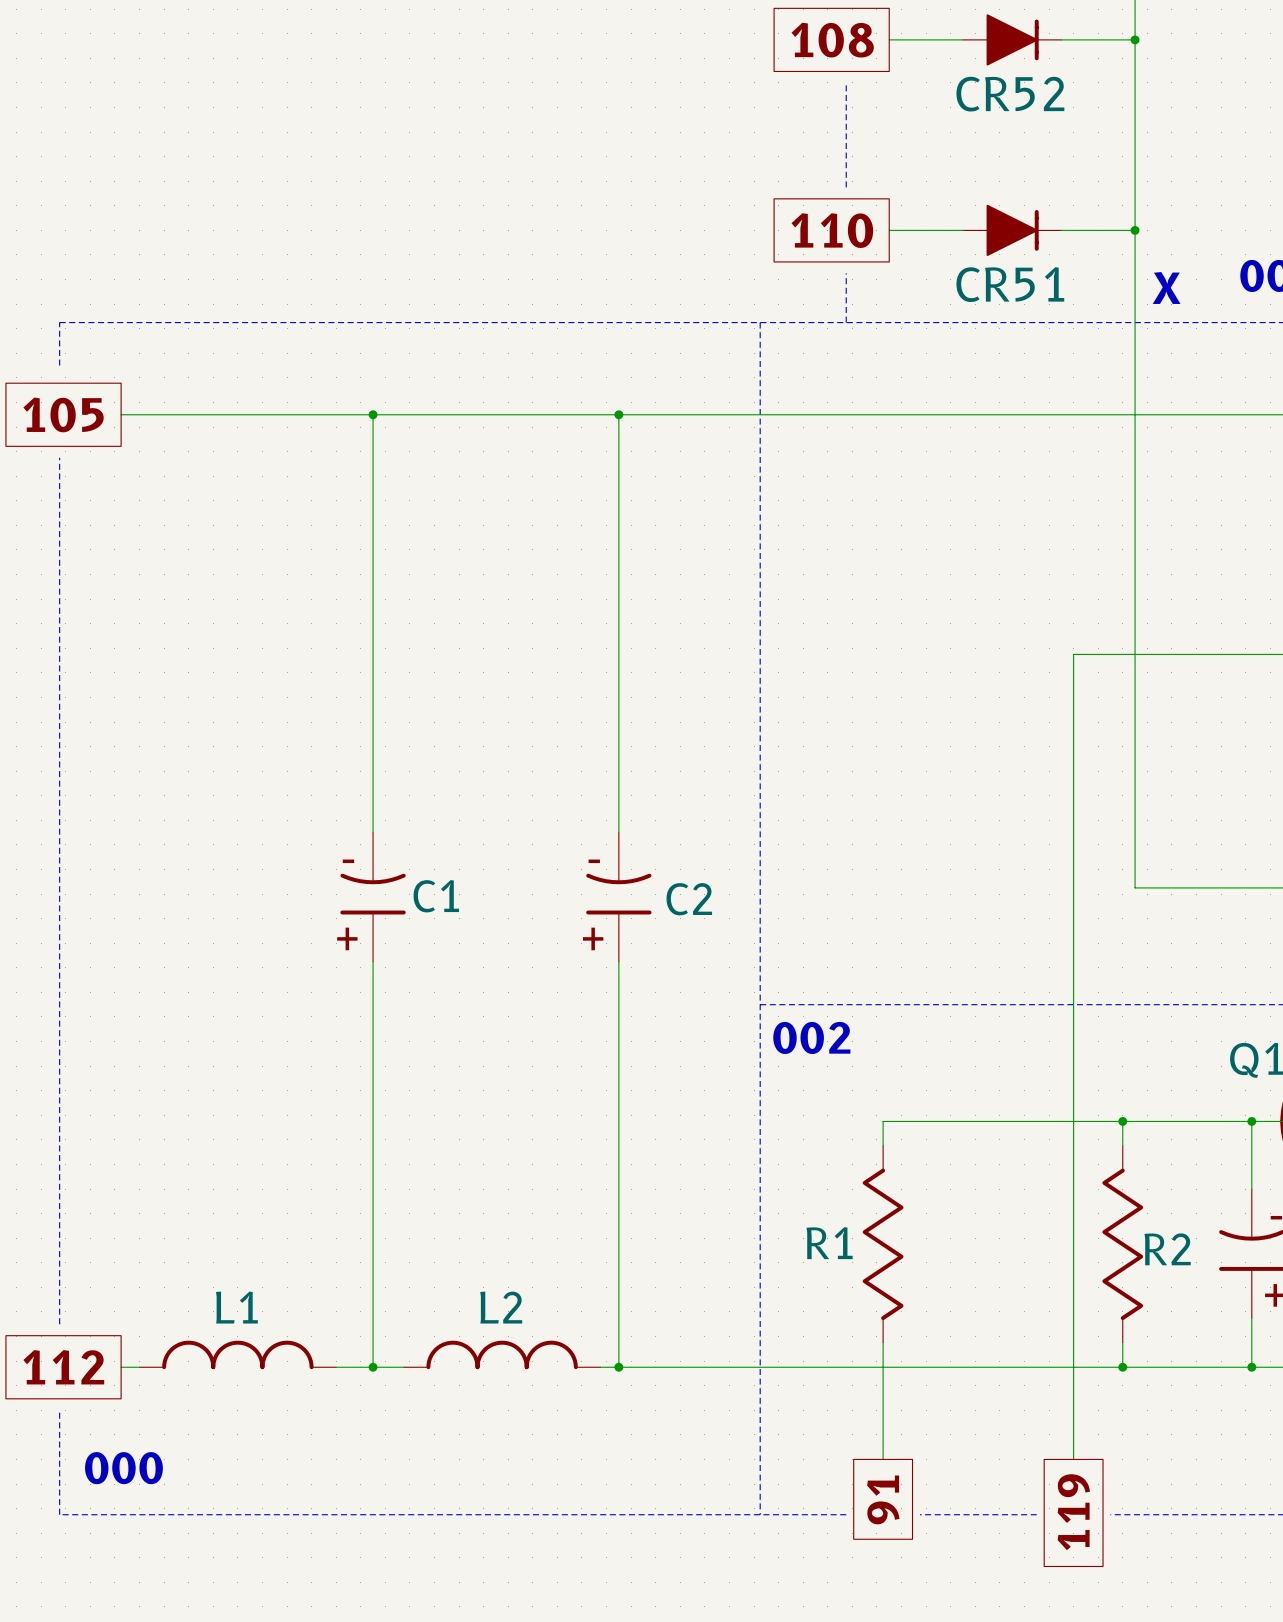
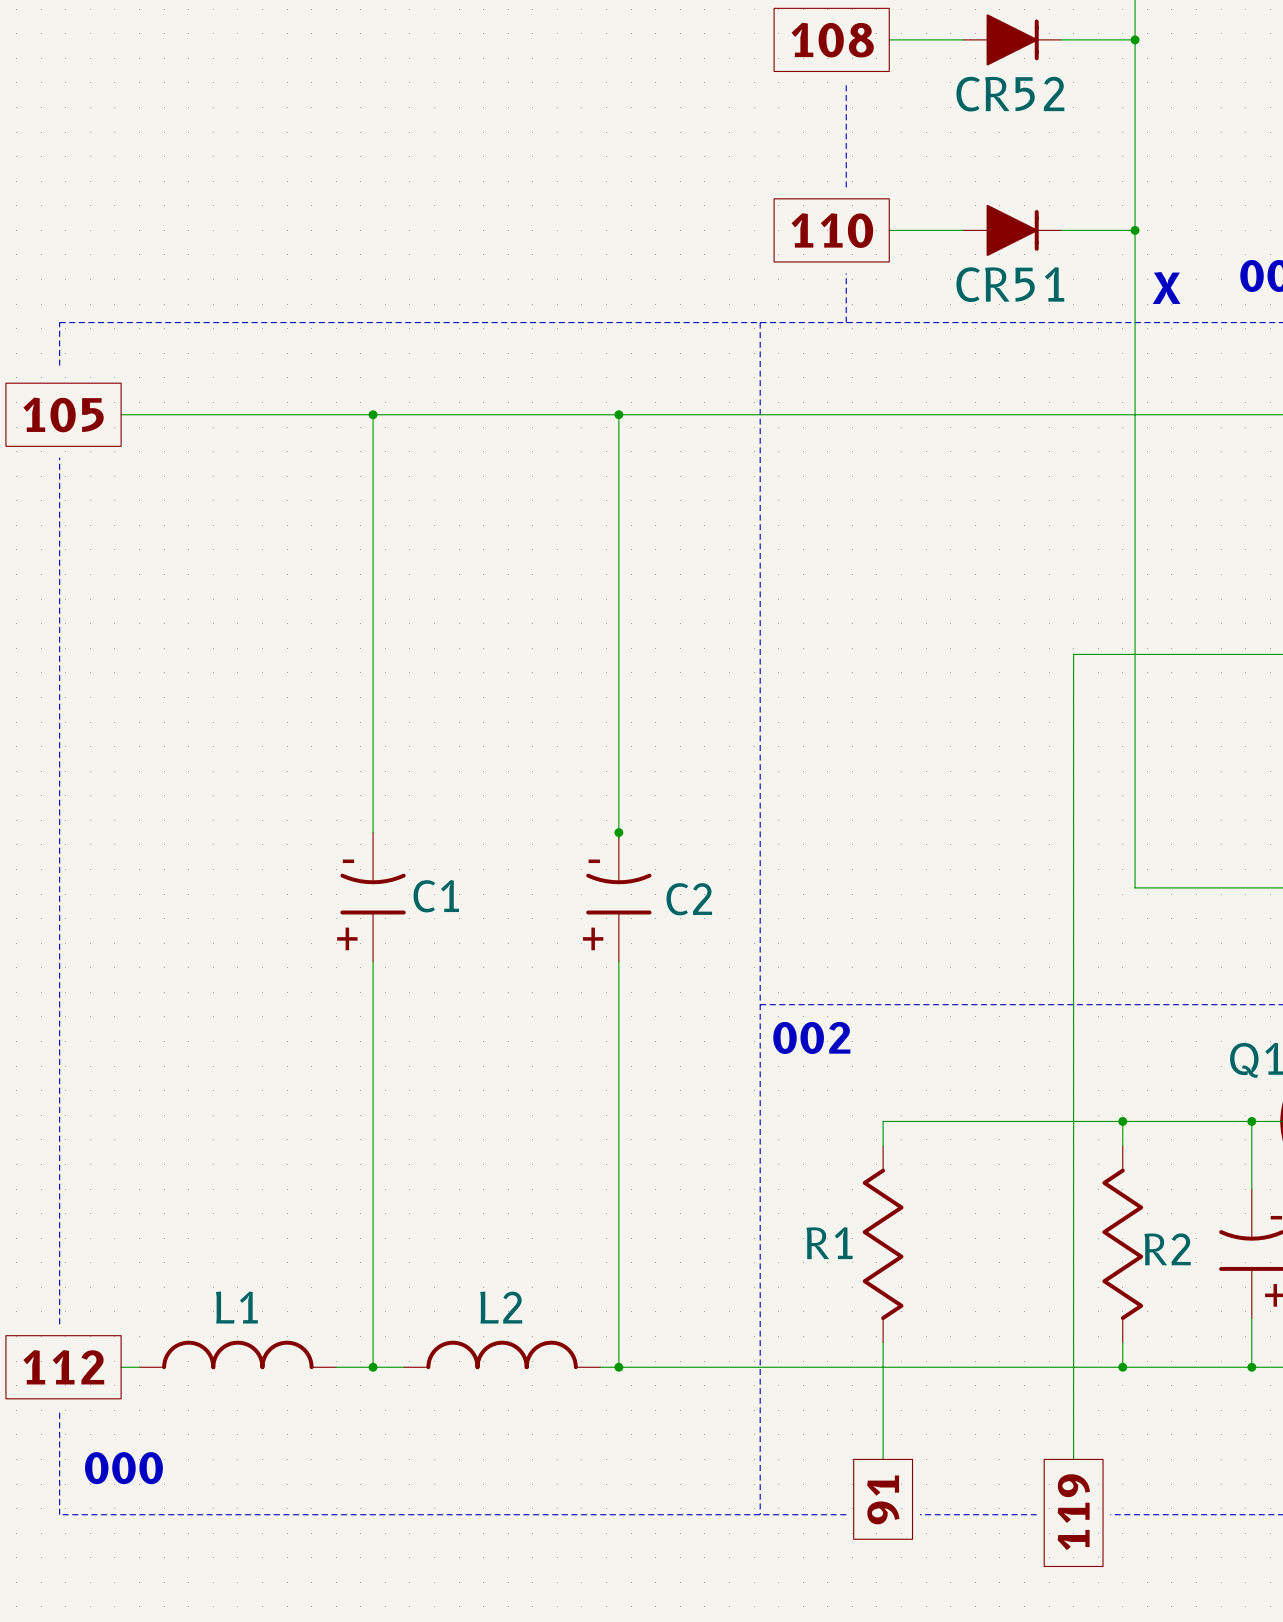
junction: none -> (618, 832)

